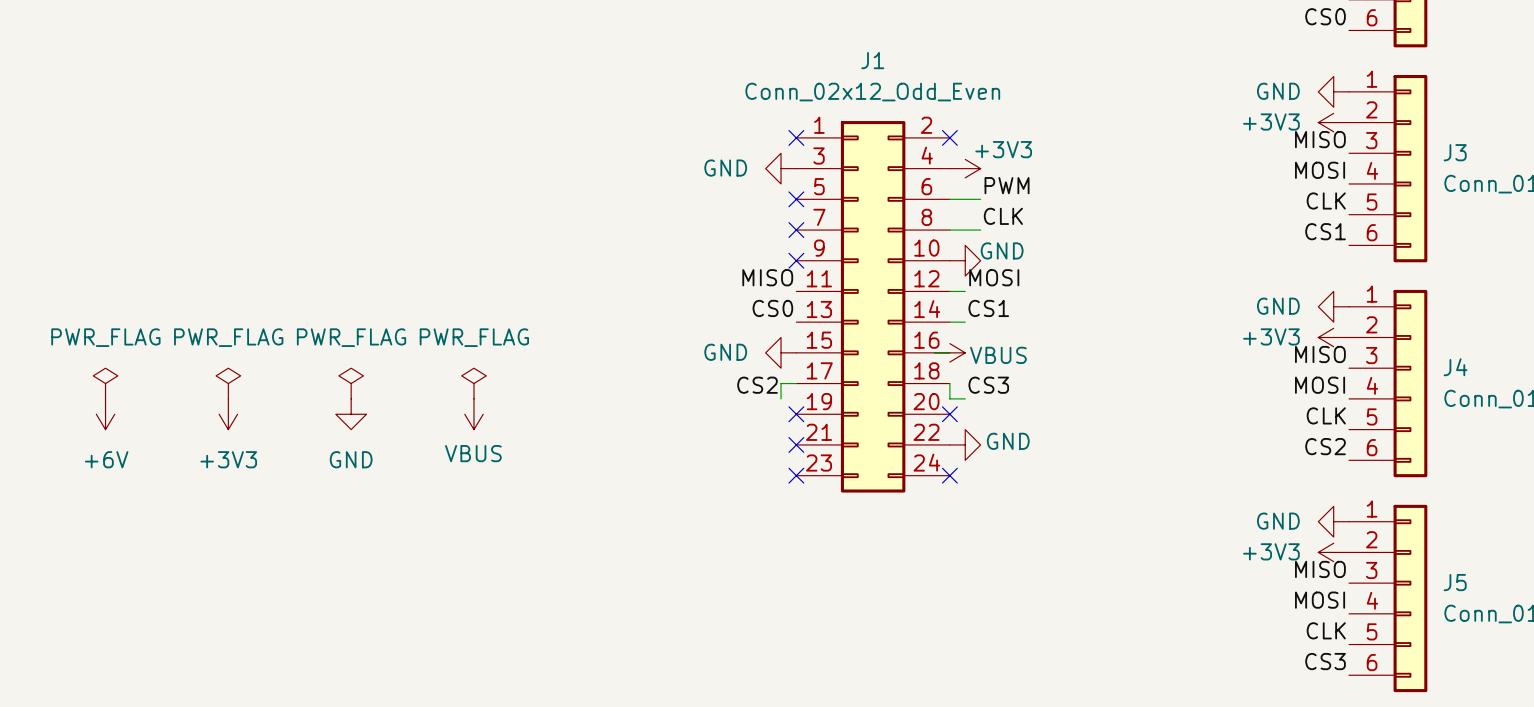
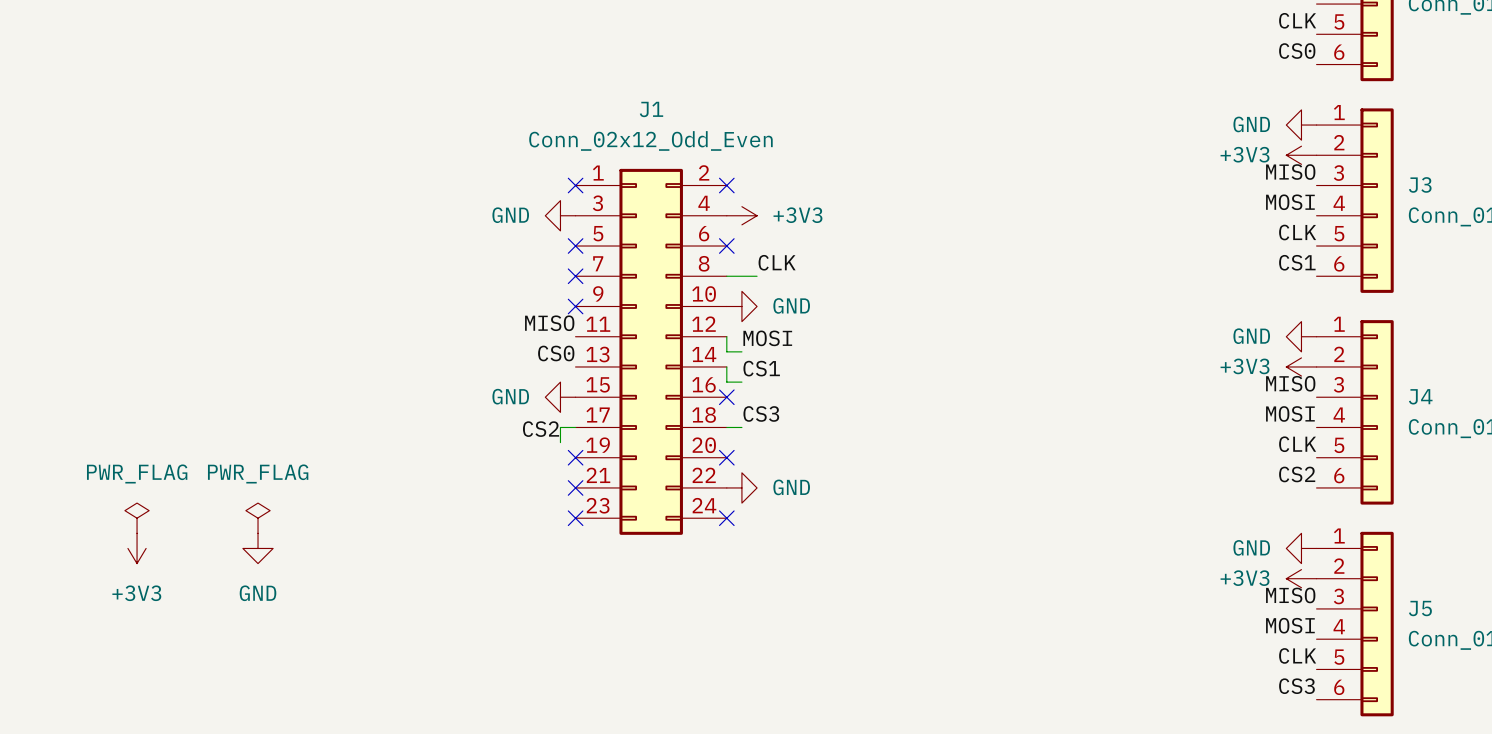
no-connect mark: (796, 137) -> none
no-connect mark: (949, 137) -> none
power symbol text position: +3V3 (1003, 149) -> +3V3 (797, 215)
no-connect mark: none -> (575, 185)
no-connect mark: none -> (726, 185)
power symbol: GND (781, 168) -> none
power symbol position: +3V3 (965, 168) -> +3V3 (741, 215)
power symbol: none -> GND (560, 215)
label: PWM (1007, 185) -> none
no-connect mark: (796, 199) -> none
wire: (949, 199) (980, 199) -> none
no-connect mark: none -> (575, 246)
no-connect mark: none -> (726, 246)
label position: CLK (1003, 216) -> CLK (777, 262)
no-connect mark: (796, 230) -> none
wire: (949, 230) (980, 230) -> (726, 276) (757, 276)
no-connect mark: none -> (575, 276)
no-connect mark: (796, 260) -> none
power symbol: GND (965, 260) -> none
no-connect mark: none -> (575, 306)
power symbol: none -> GND (741, 306)
label position: MISO (767, 277) -> MISO (549, 323)
label position: MOSI (994, 277) -> MOSI (767, 338)
wire: (949, 291) (965, 291) -> none
wire: none -> (726, 336) (726, 351) (741, 351)
J1 position: (873, 306) -> (651, 351)
label position: CS0 (772, 308) -> CS0 (556, 353)
label position: CS1 (988, 308) -> CS1 (761, 368)
wire: (949, 322) (965, 322) -> none
power symbol: GND (781, 352) -> none
wire: (934, 352) (949, 352) -> (726, 427) (741, 427)
power symbol: VBUS (949, 352) -> none
power symbol: none -> GND (560, 397)
no-connect mark: none -> (726, 397)
power symbol: PWR_FLAG (105, 383) -> none
power symbol: PWR_FLAG (228, 383) -> none
power symbol: PWR_FLAG (351, 383) -> none
power symbol: PWR_FLAG (473, 383) -> none
wire: (796, 383) (781, 383) (781, 398) -> (575, 427) (560, 427) (560, 442)
wire: (949, 383) (949, 398) (965, 398) -> (726, 366) (726, 382) (741, 382)
label position: CS2 (757, 385) -> CS2 (541, 429)
label position: CS3 (988, 385) -> CS3 (761, 413)
power symbol: +6V (105, 414) -> none
power symbol position: +3V3 (228, 414) -> +3V3 (137, 548)
power symbol: GND (351, 414) -> none
power symbol: VBUS (473, 414) -> none
no-connect mark: (796, 414) -> none
no-connect mark: (949, 414) -> none
no-connect mark: none -> (575, 457)
no-connect mark: none -> (726, 457)
no-connect mark: (796, 444) -> none
power symbol: GND (965, 444) -> none
no-connect mark: none -> (575, 487)
power symbol: none -> GND (741, 487)
no-connect mark: (796, 475) -> none
no-connect mark: (949, 475) -> none
power symbol: none -> PWR_FLAG (137, 518)
power symbol: none -> PWR_FLAG (258, 518)
no-connect mark: none -> (575, 518)
no-connect mark: none -> (726, 518)
power symbol: none -> GND (258, 548)

